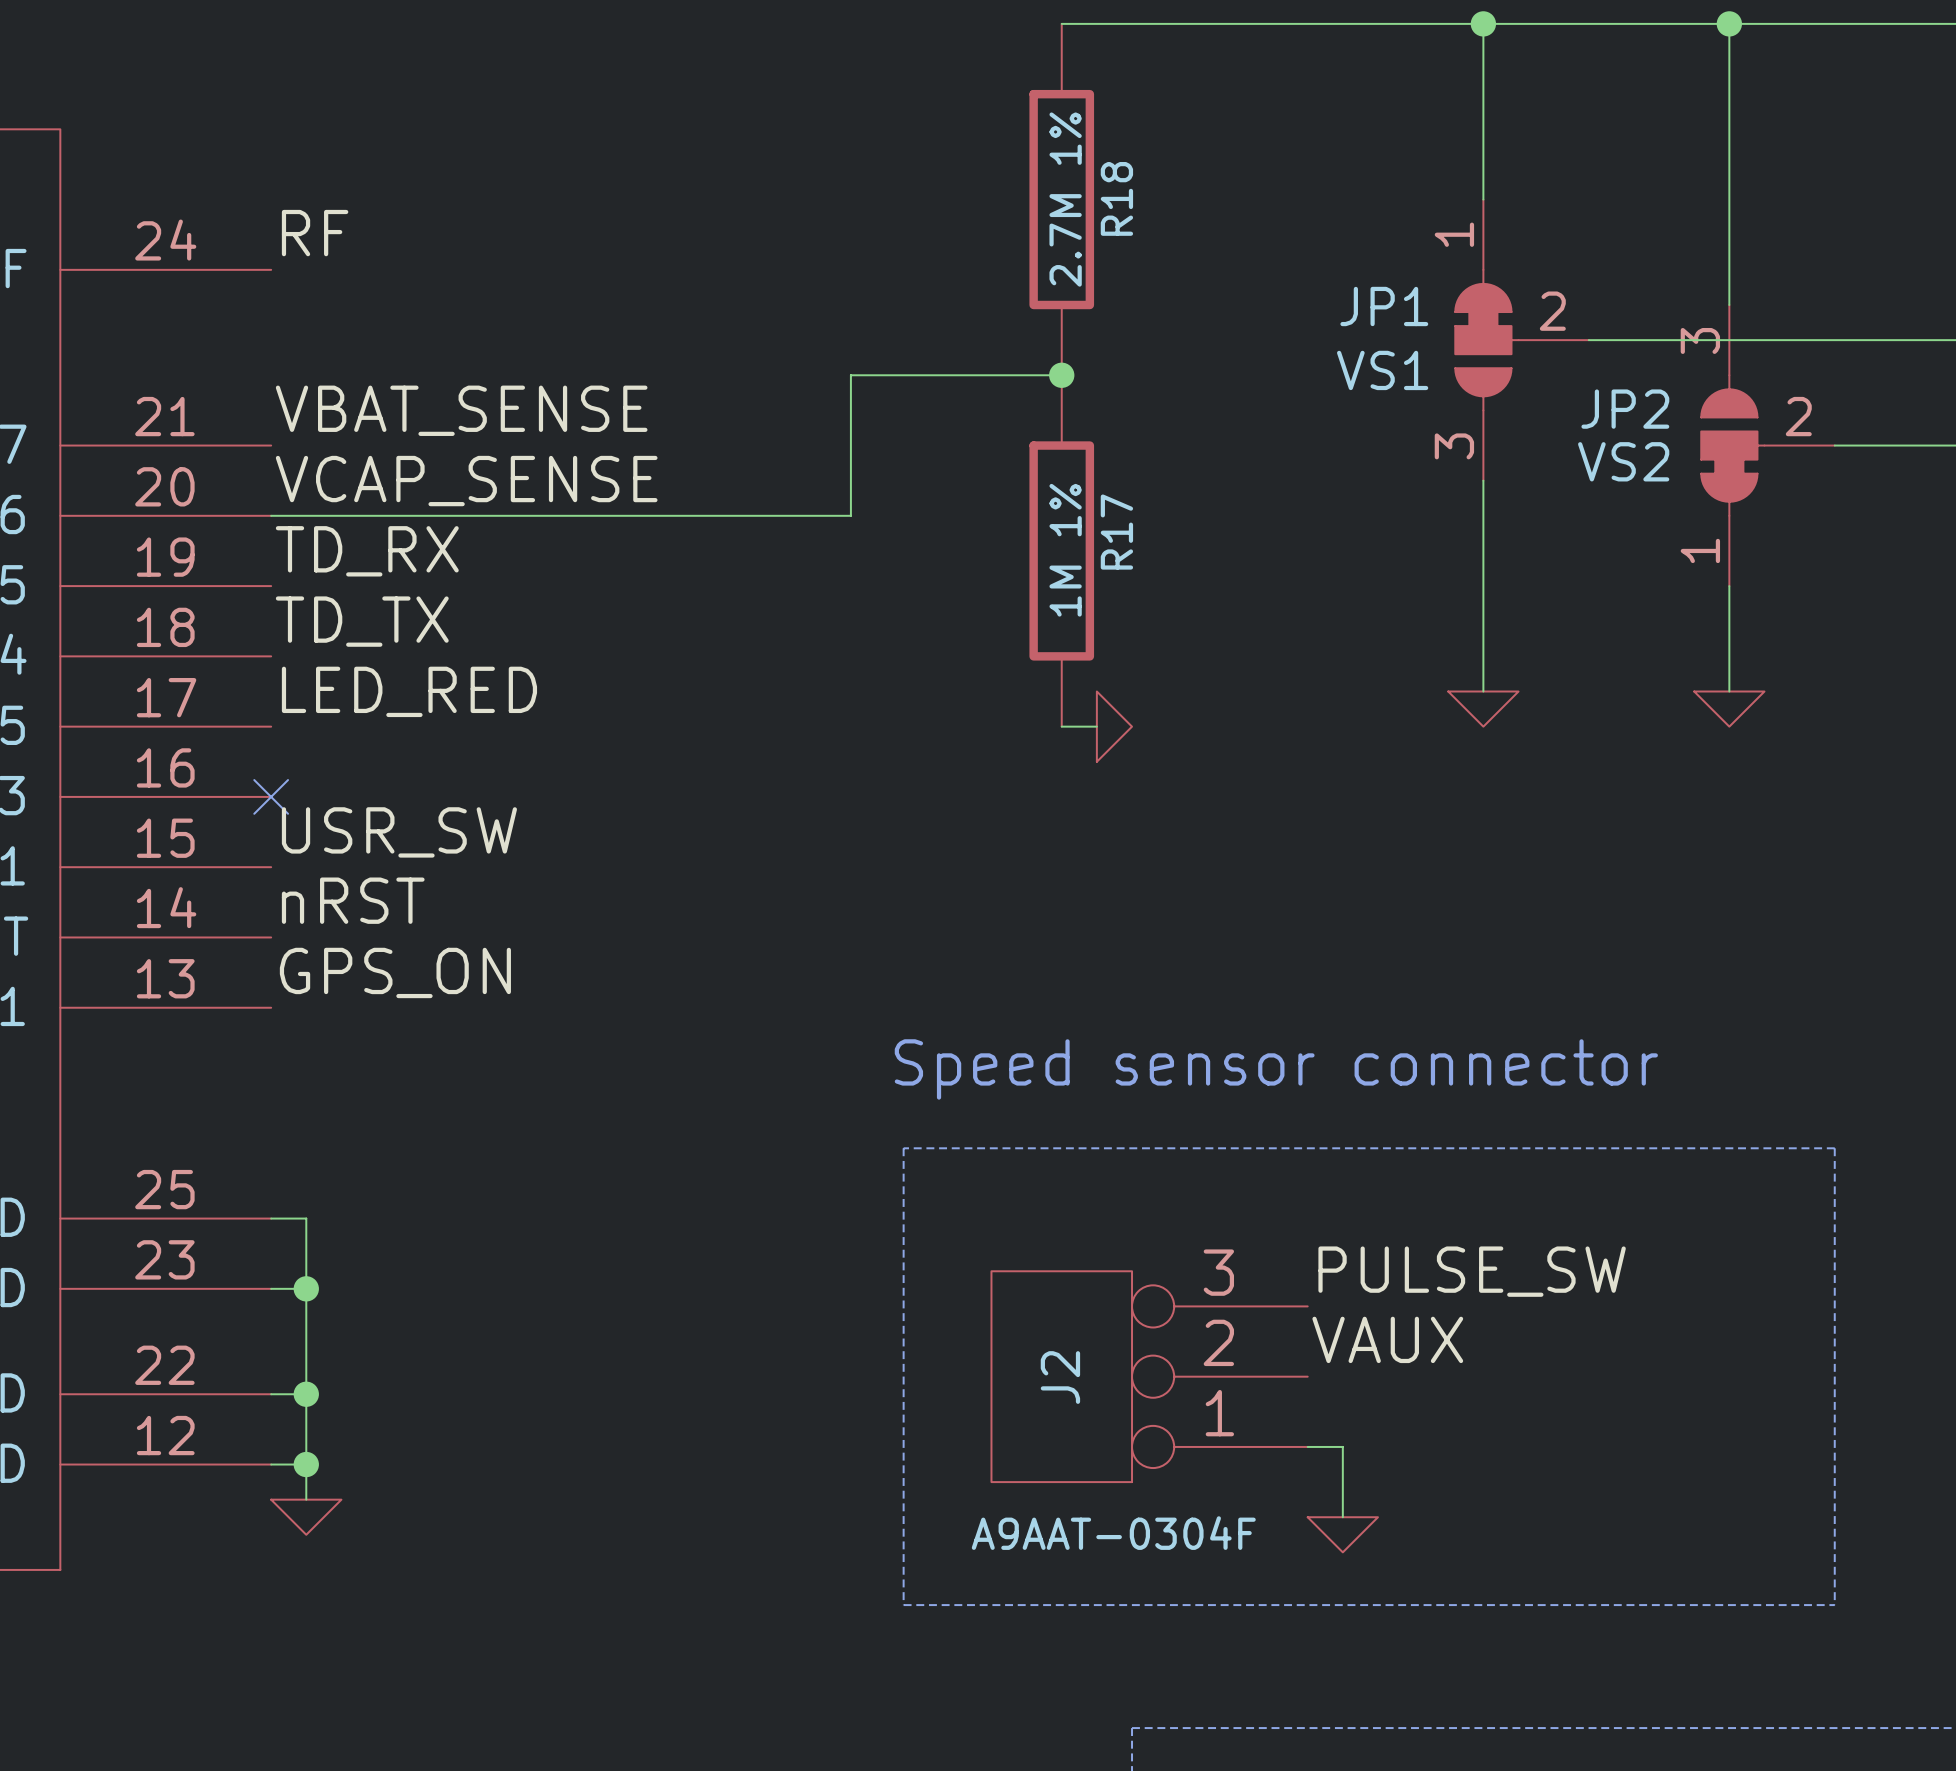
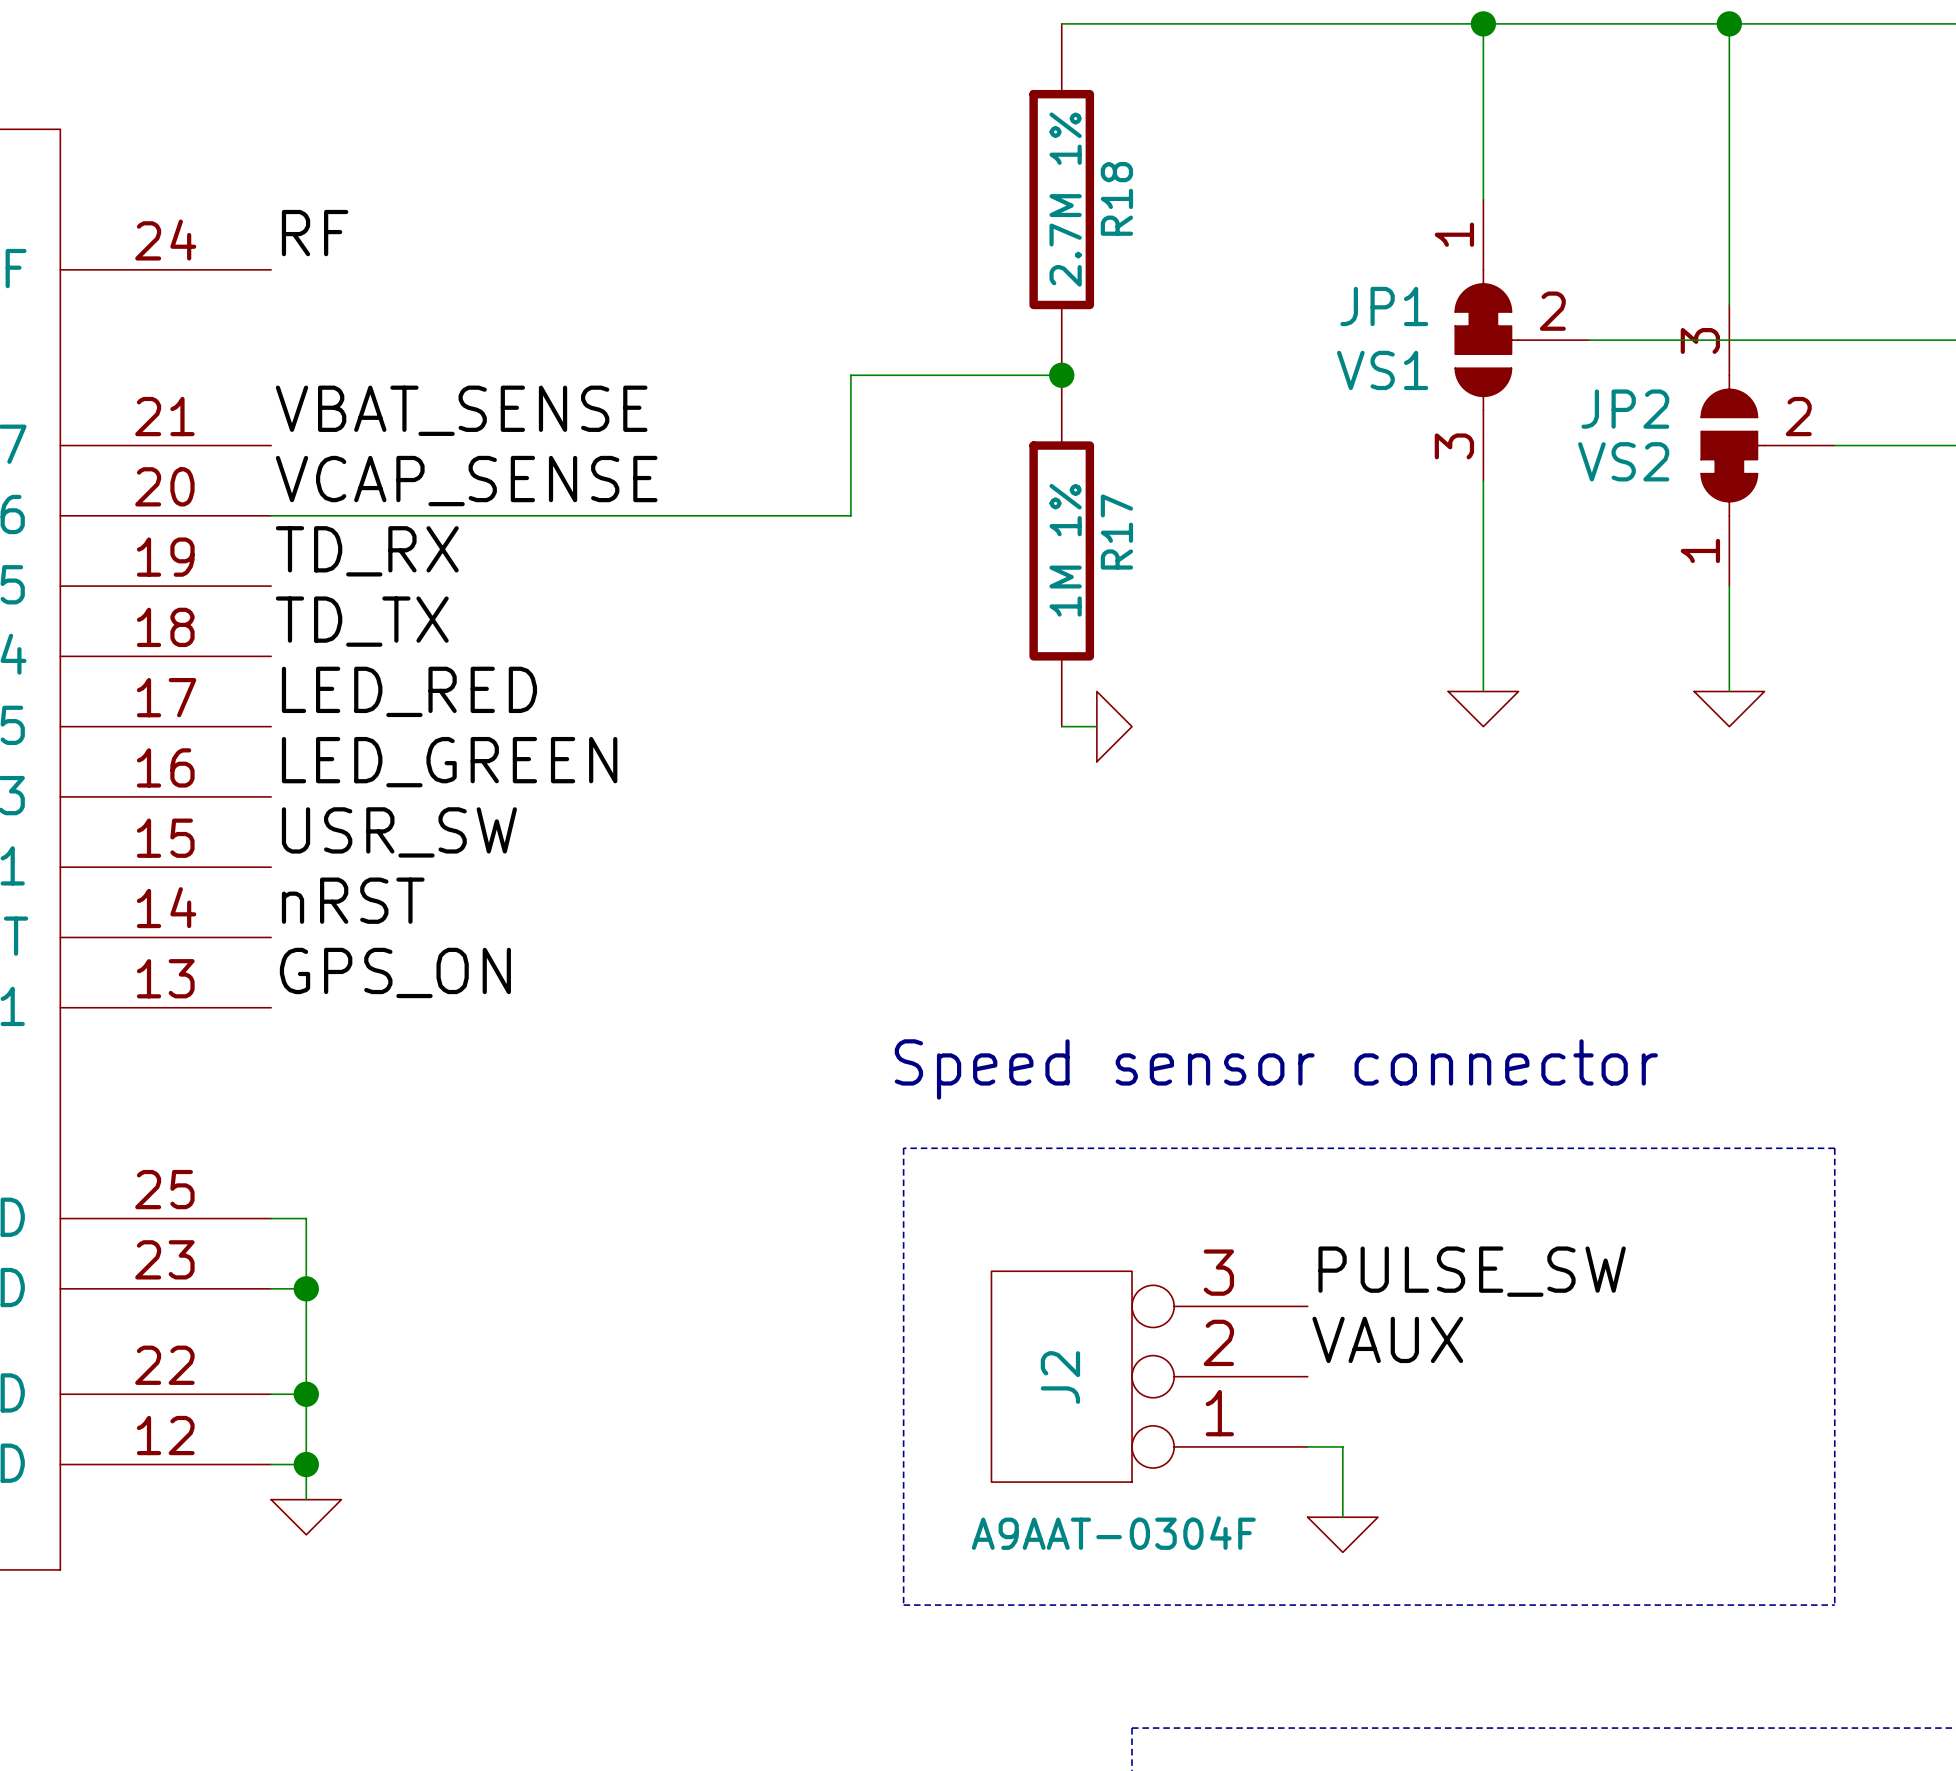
label: none -> LED_GREEN (449, 762)
no-connect mark: (271, 796) -> none

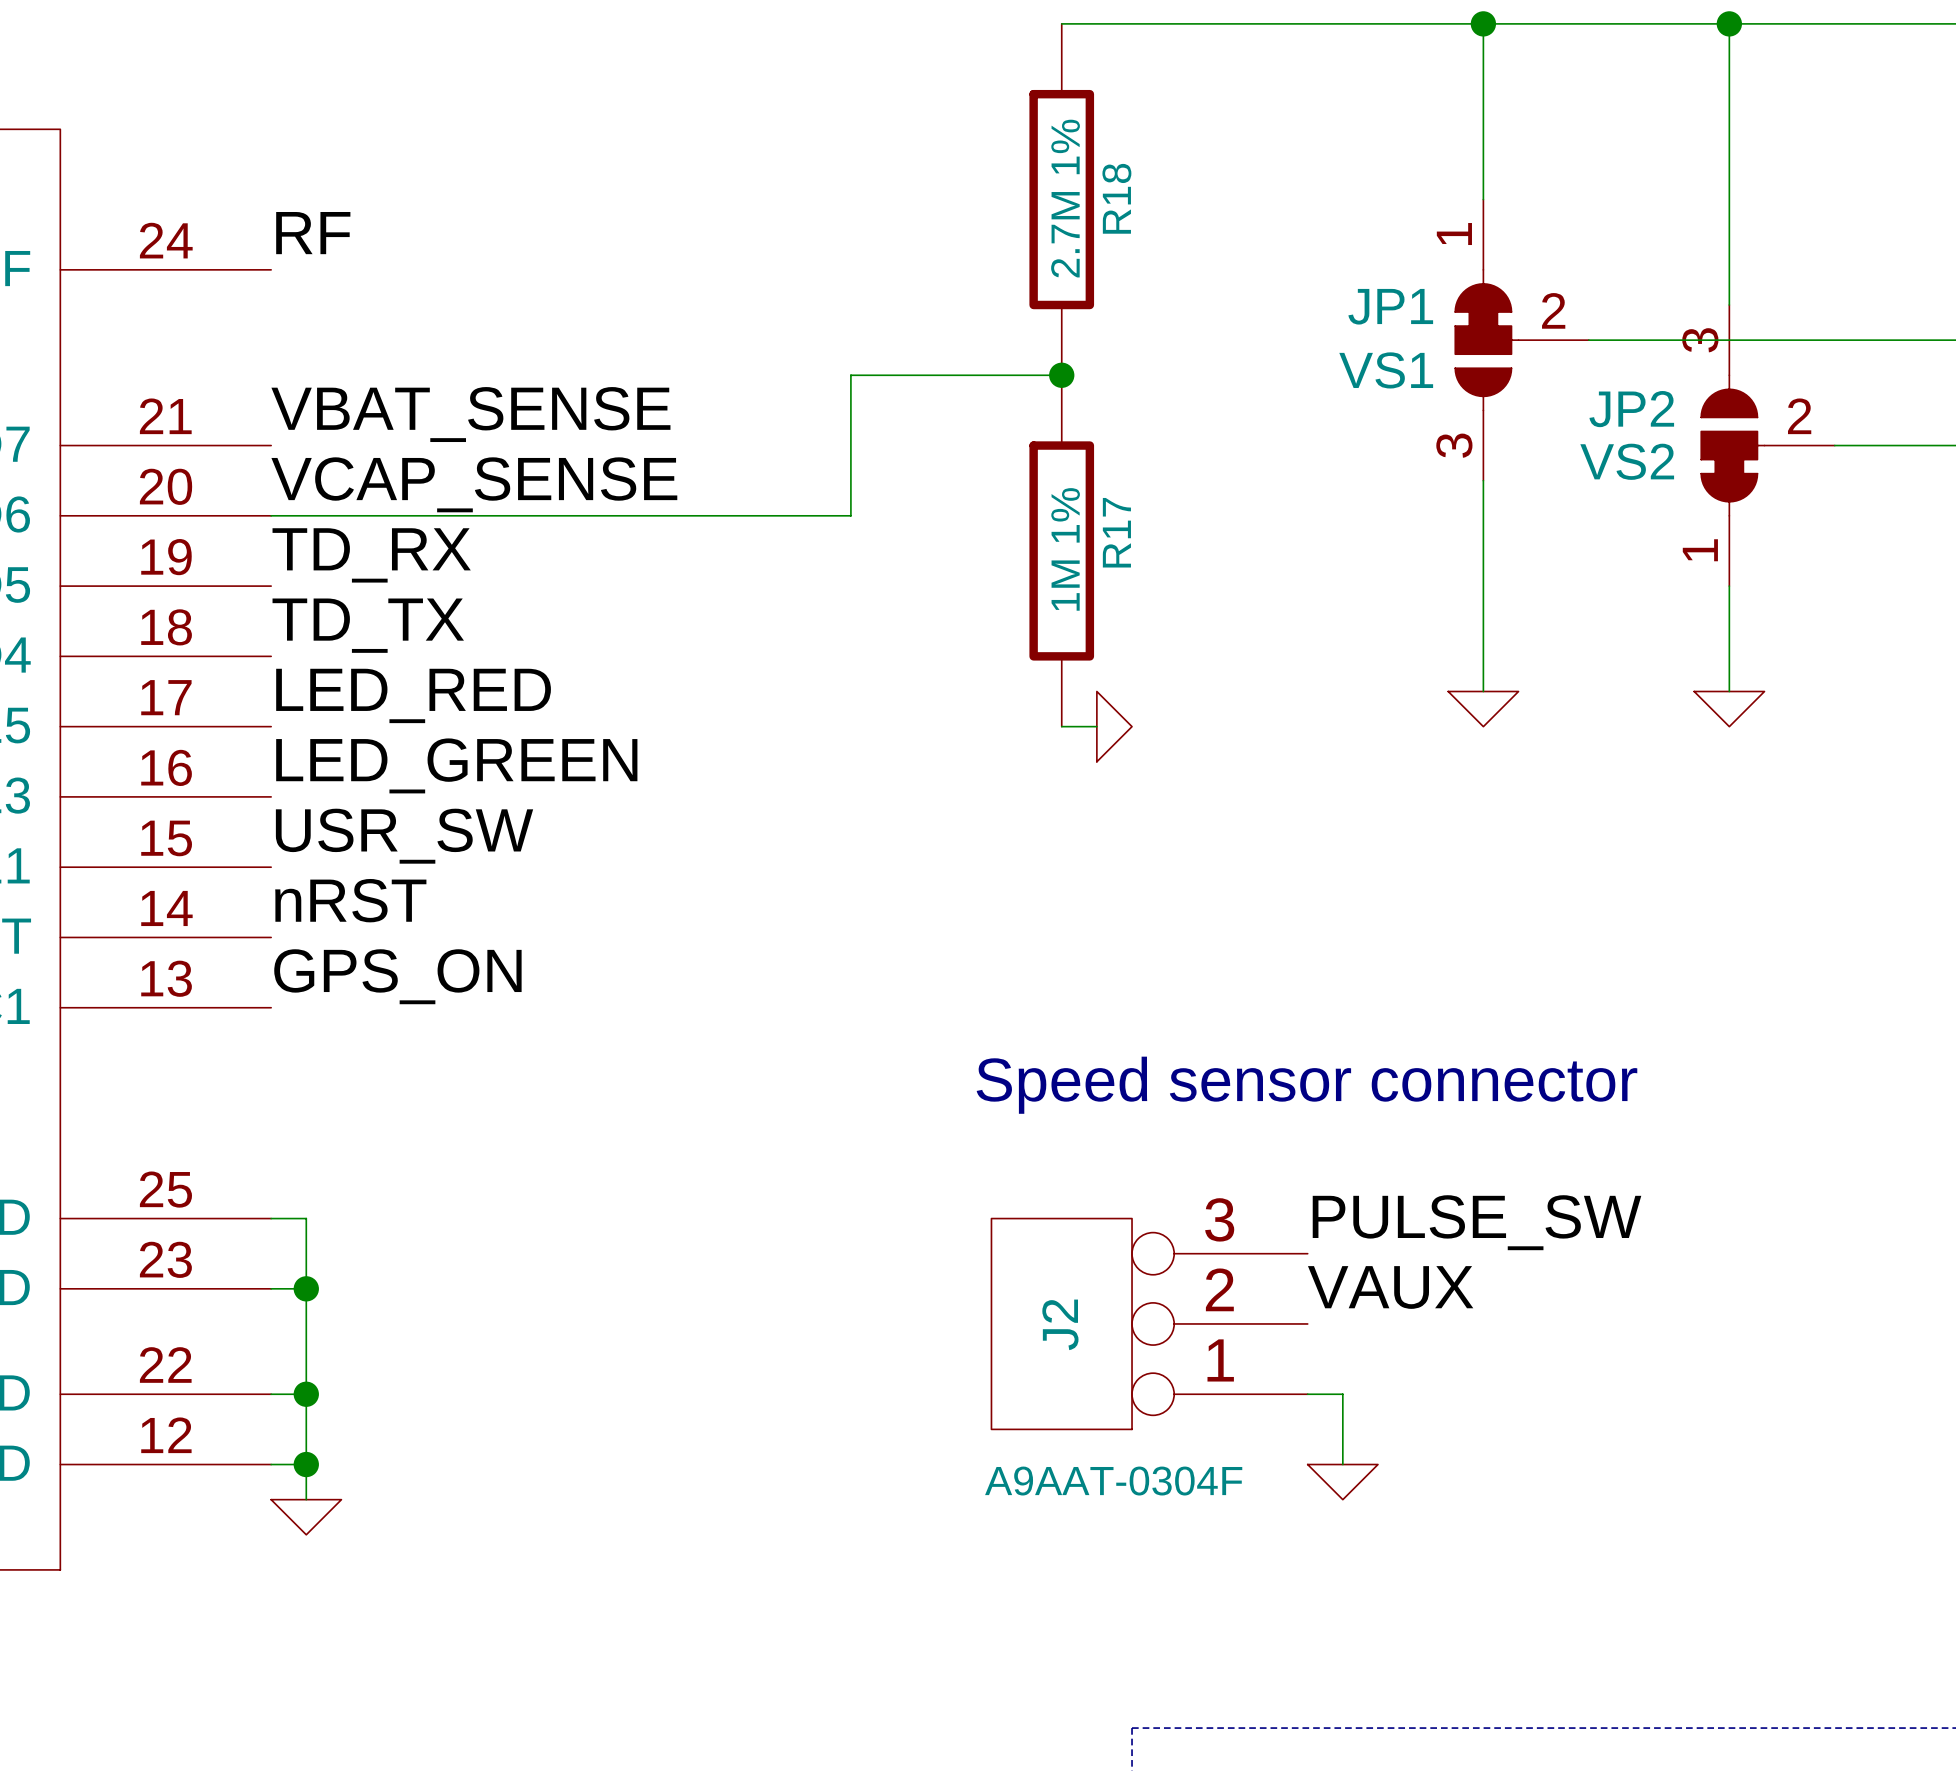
text position: Speed sensor connector (1276, 1069) -> Speed sensor connector (1306, 1085)
line: (903, 1148) (1834, 1148) (1834, 1605) (903, 1605) (903, 1148) -> none
label position: PULSE_SW (1472, 1271) -> PULSE_SW (1477, 1222)
label position: VAUX (1387, 1339) -> VAUX (1390, 1287)
J2 position: (1149, 1376) -> (1149, 1323)
wire: (1307, 1446) (1342, 1446) -> (1307, 1394) (1342, 1394) (1342, 1446)
wire: (1342, 1464) (1342, 1517) -> none
power symbol position: (1342, 1534) -> (1342, 1482)

